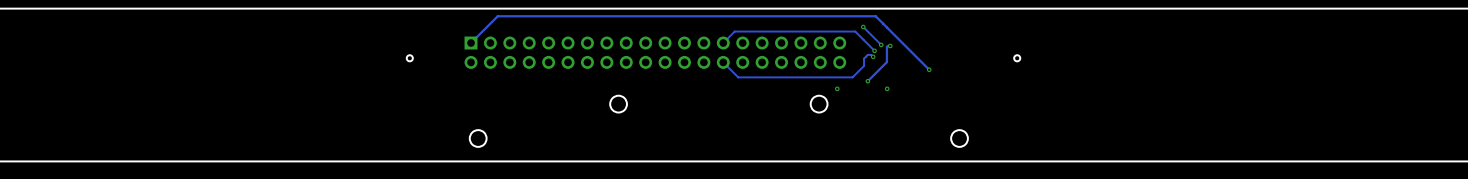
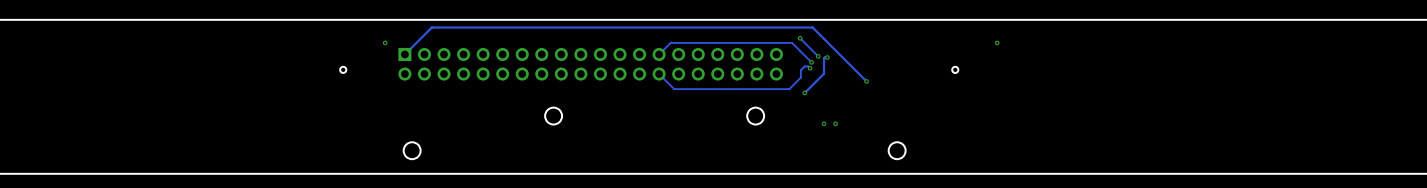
via: none -> (385, 42)
via: none -> (997, 42)
via: (837, 88) -> none
via: (887, 88) -> none
via: none -> (824, 123)
via: none -> (835, 123)

